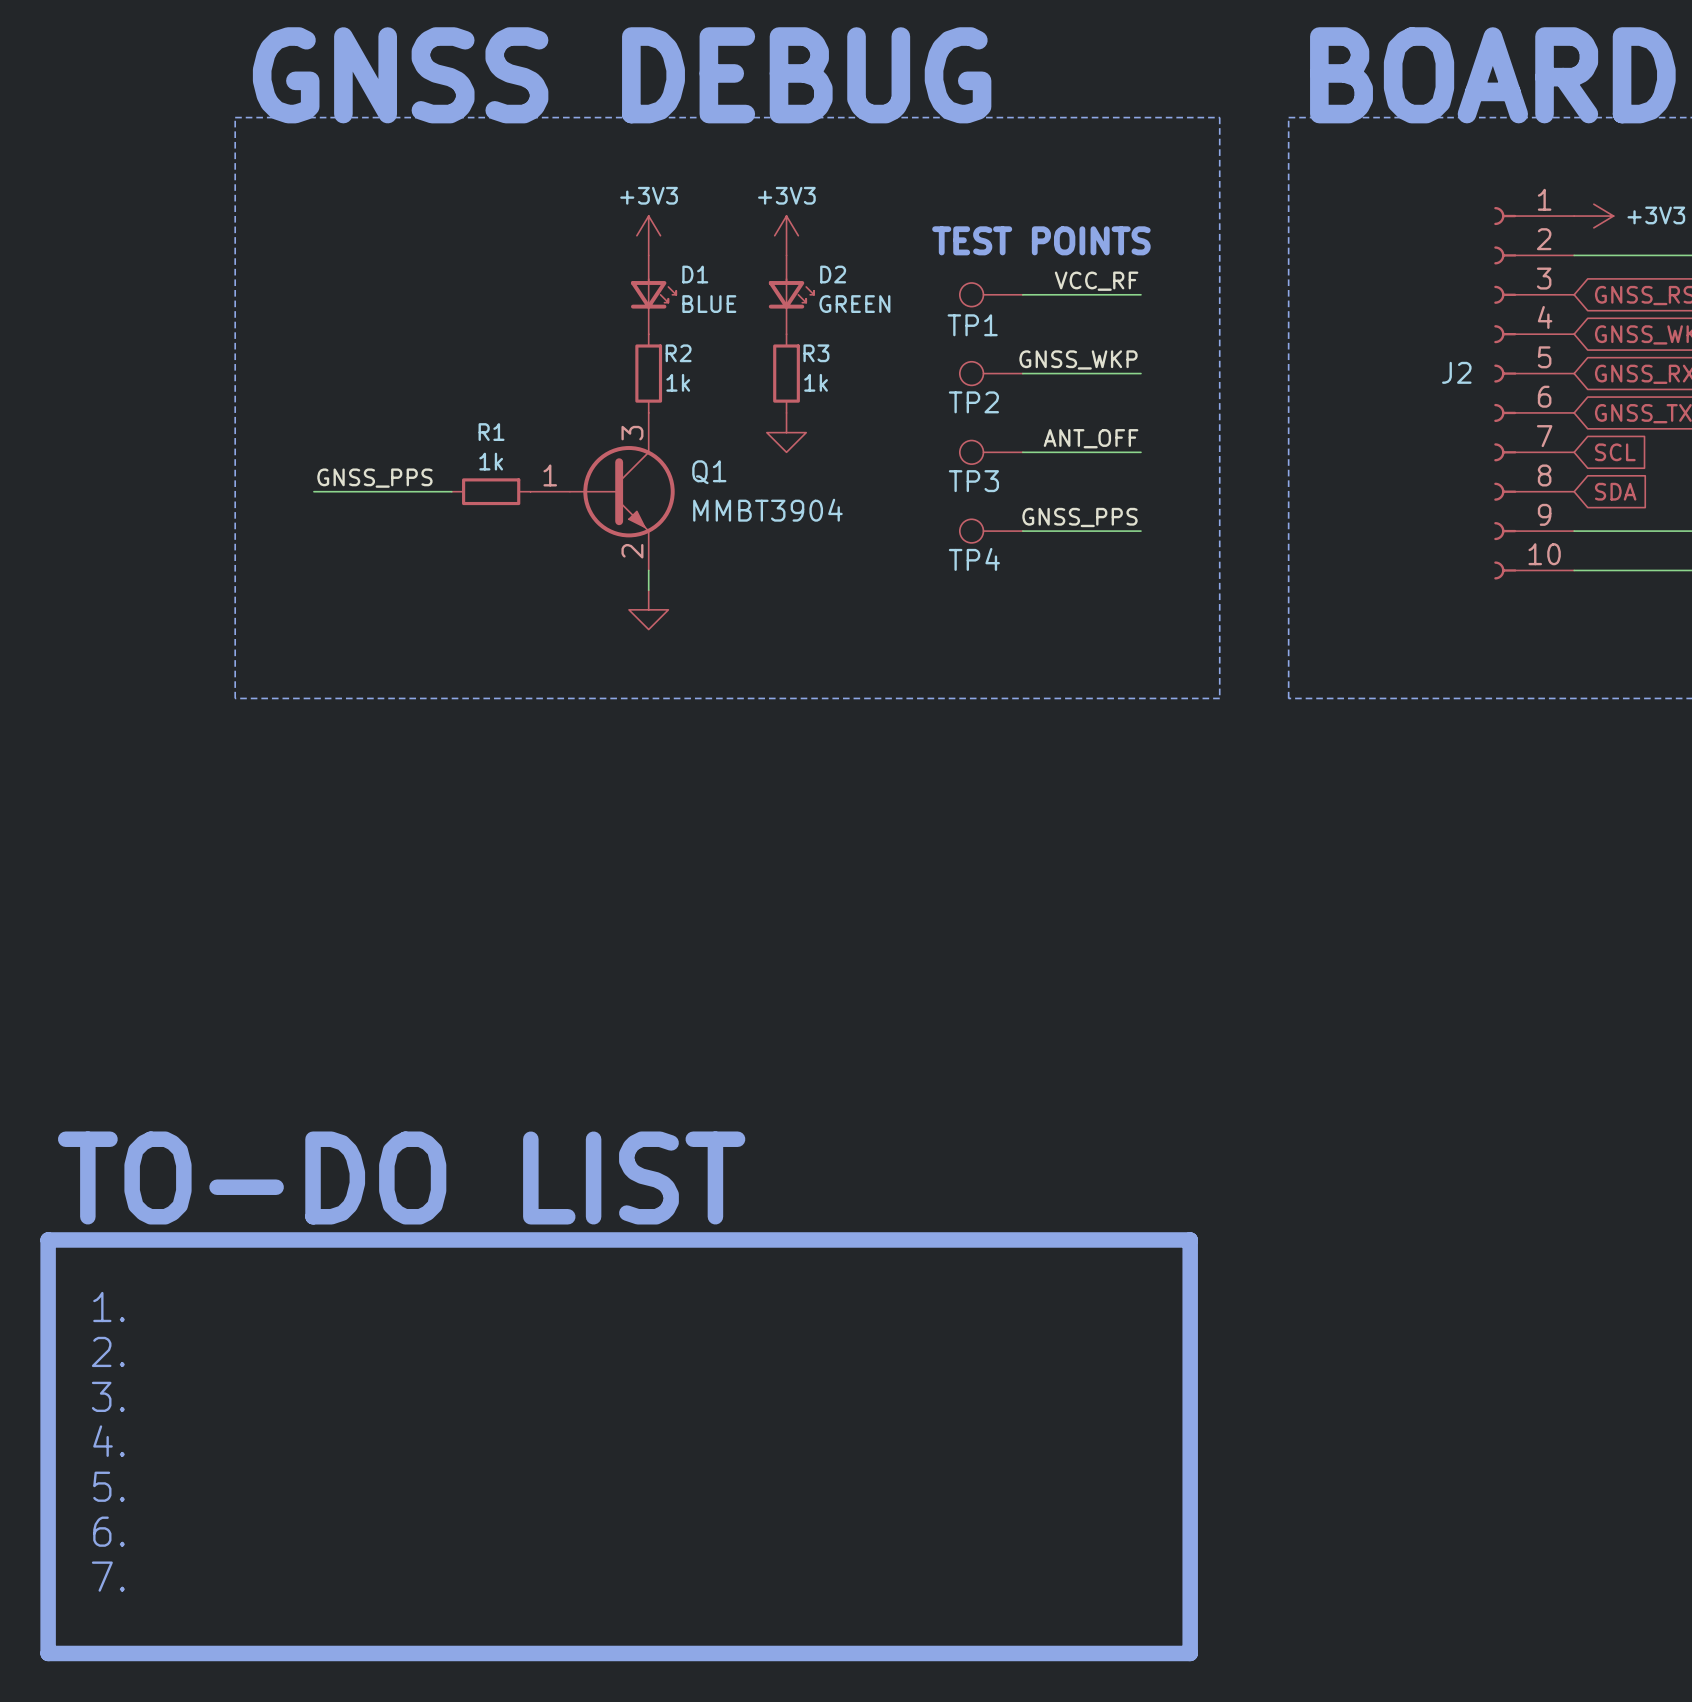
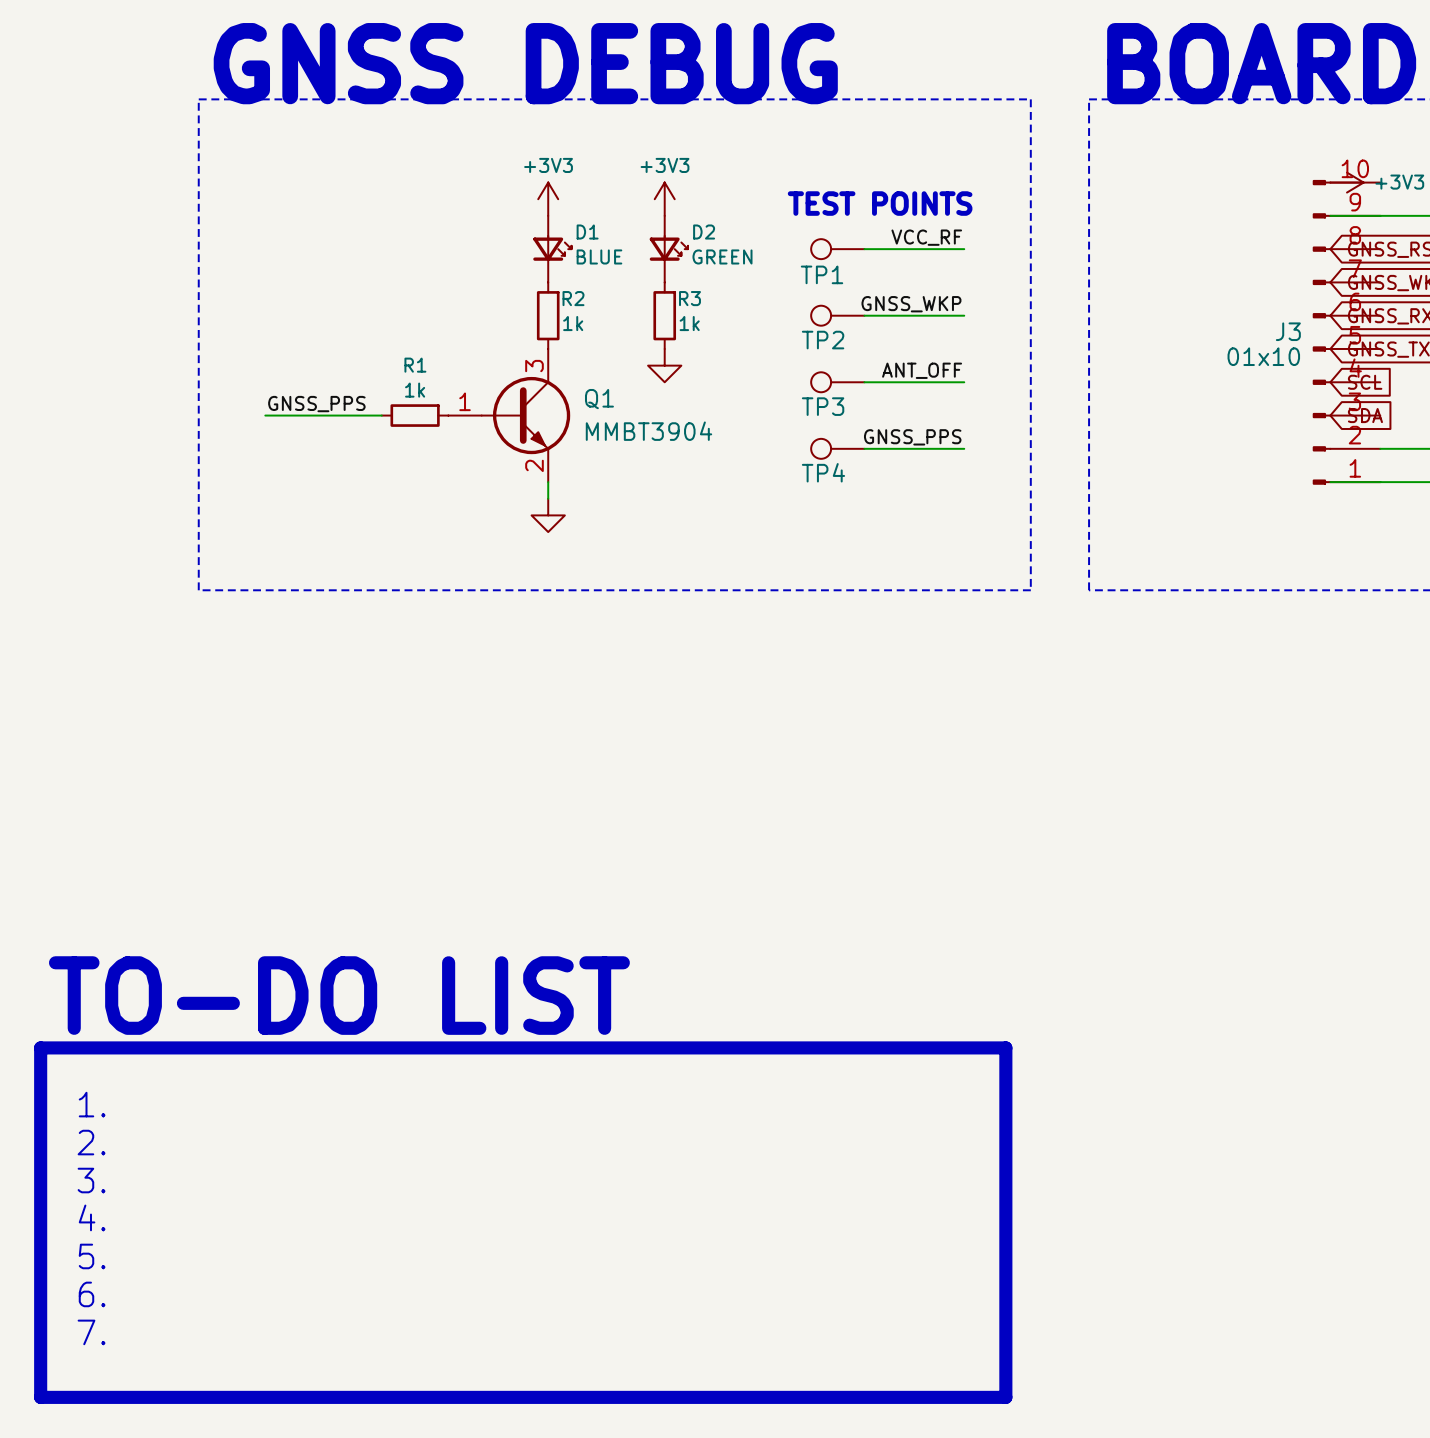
J2: (1534, 393) -> none
J3: none -> 01x10 (1346, 332)

